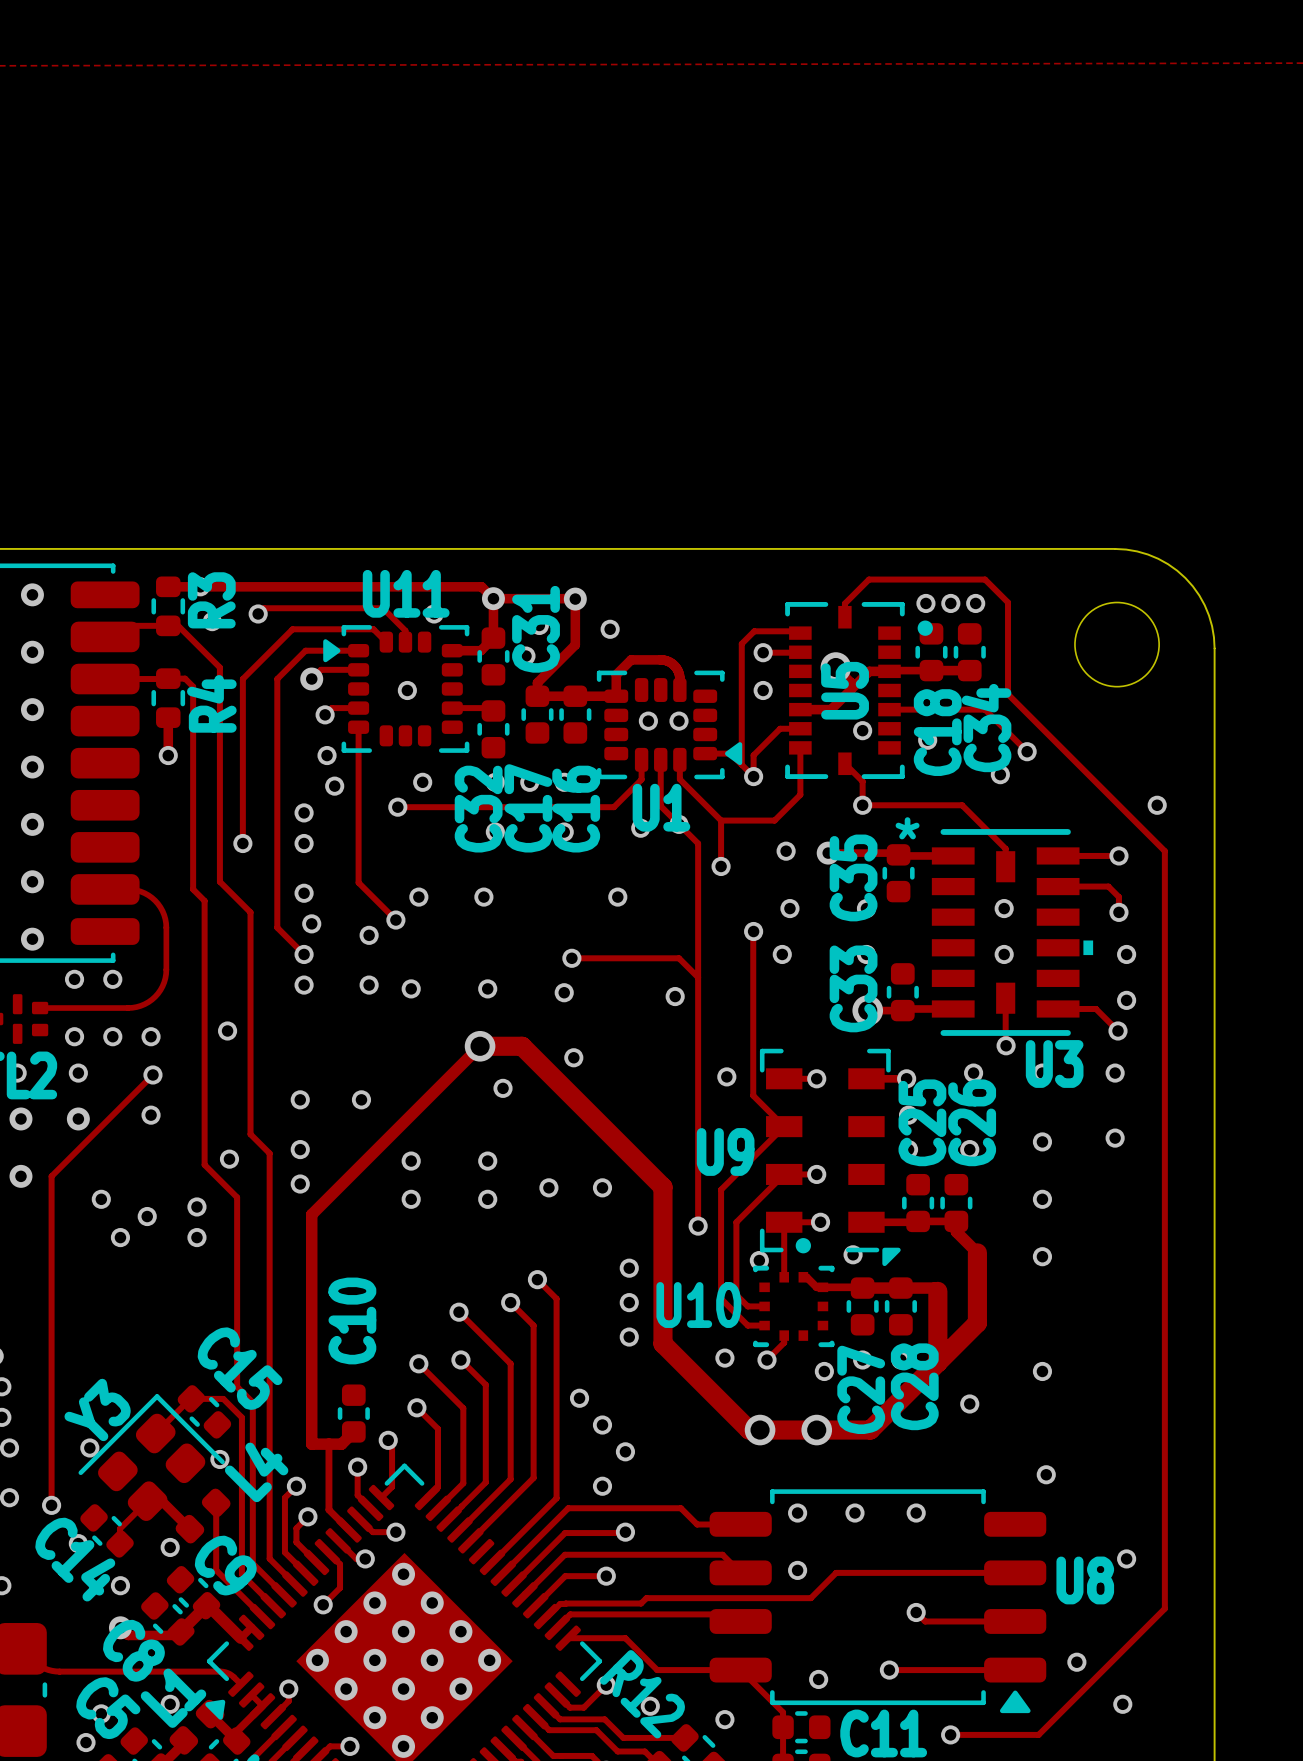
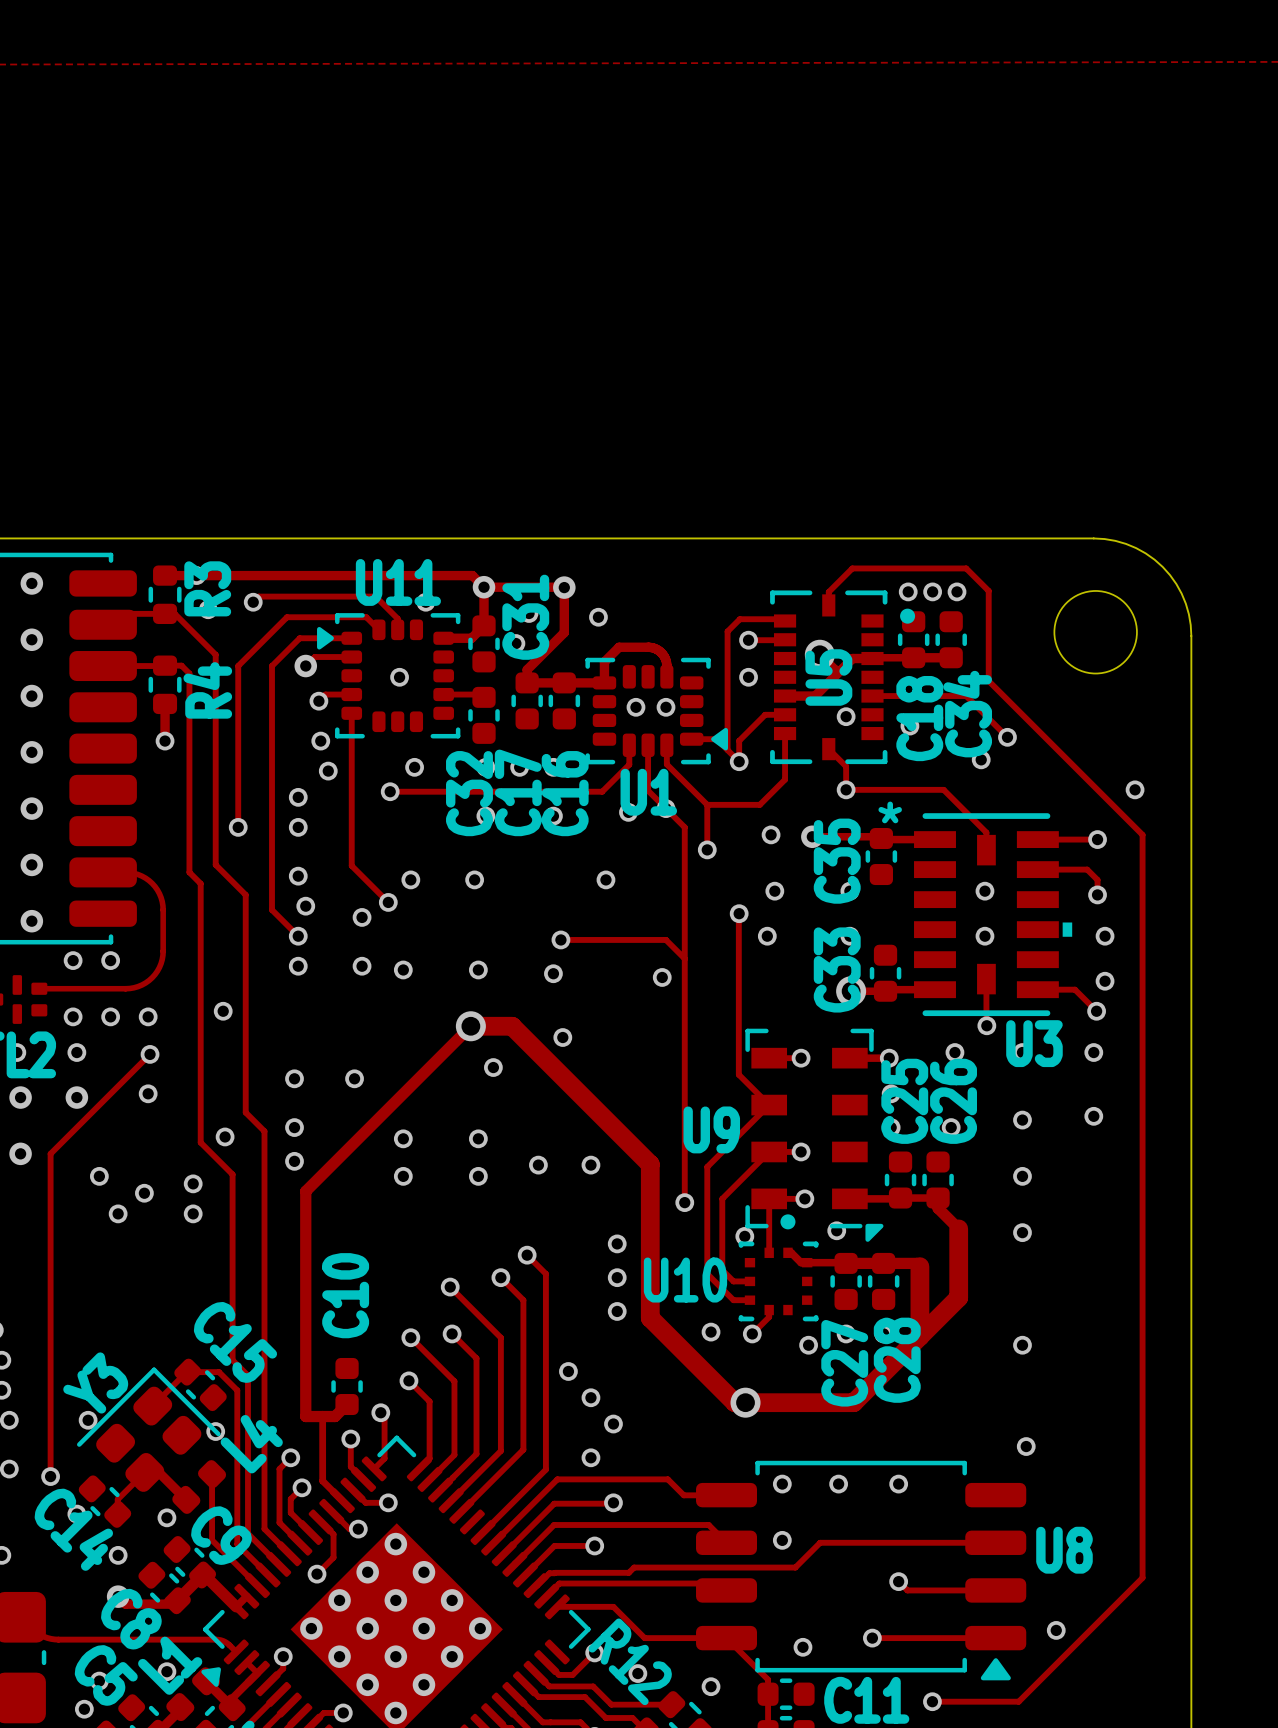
via: (726, 1076) -> none
via: (969, 1403) -> none
via: (816, 1430) -> none
via: (1126, 1558) -> none
via: (1122, 1704) -> none

